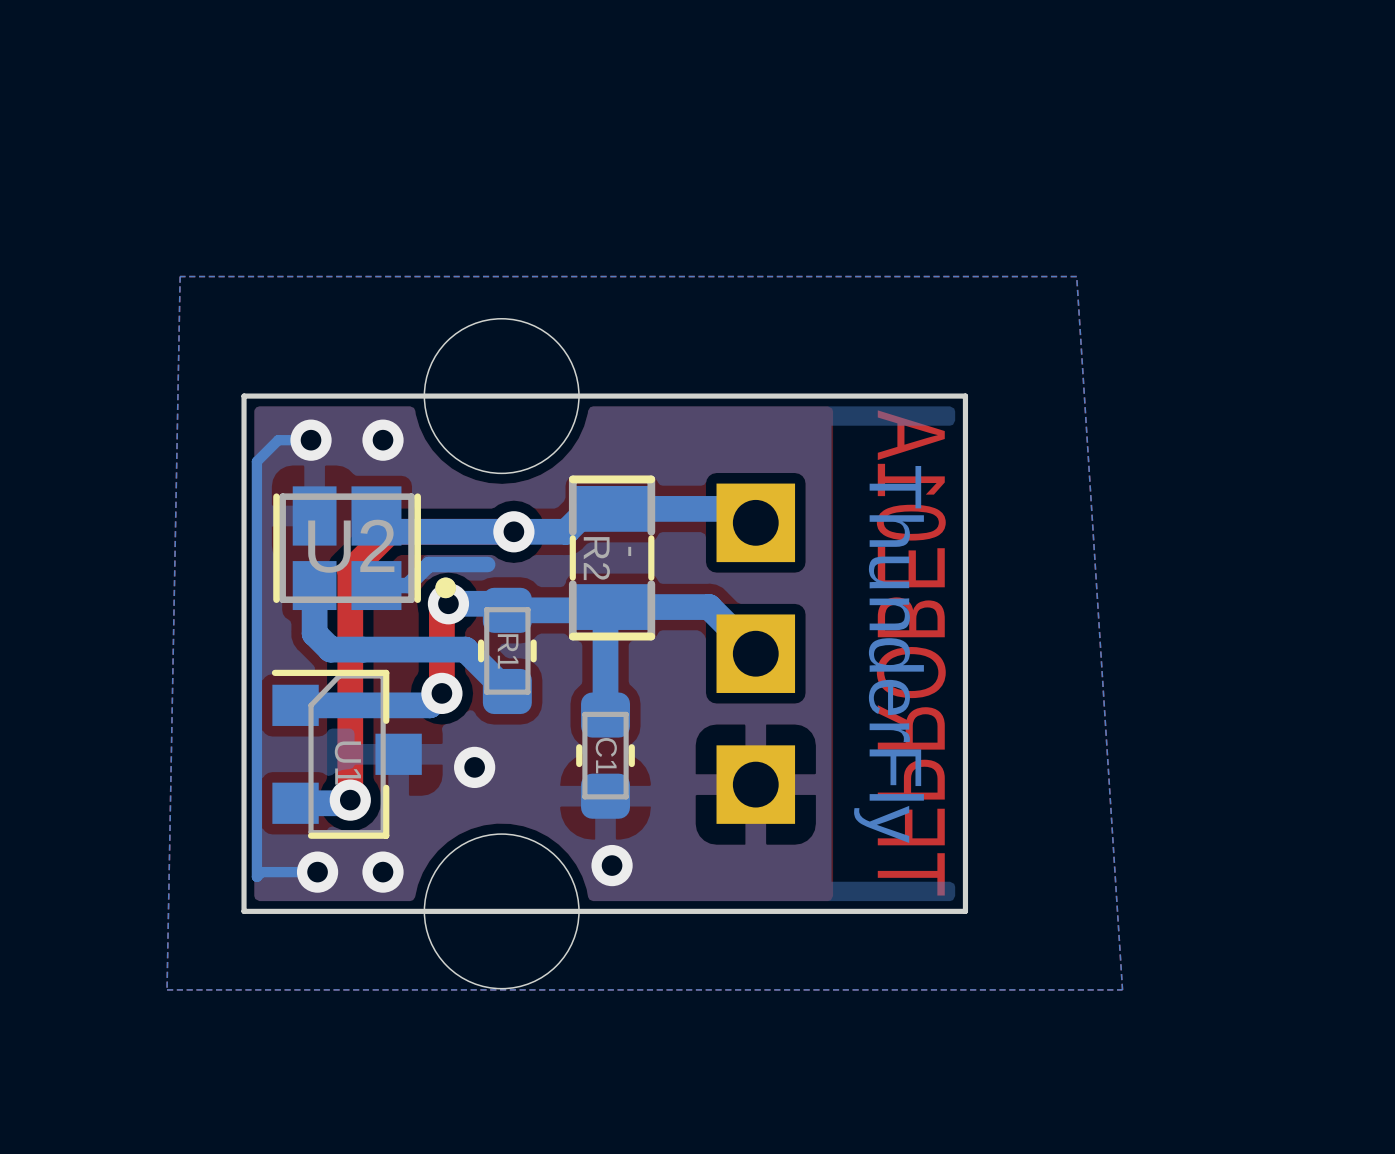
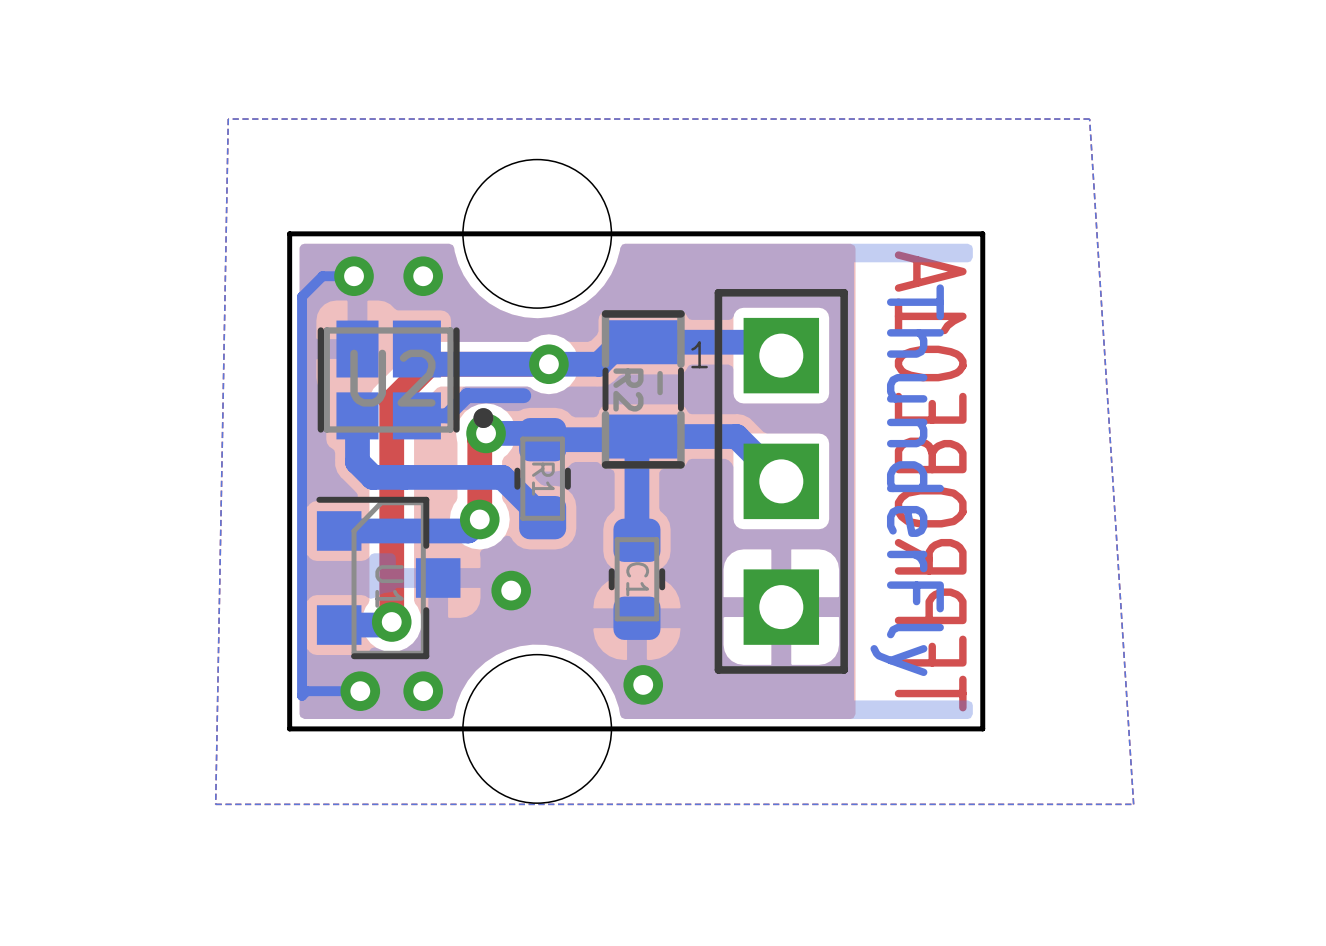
part side: top (755, 653) -> bottom (781, 481)

